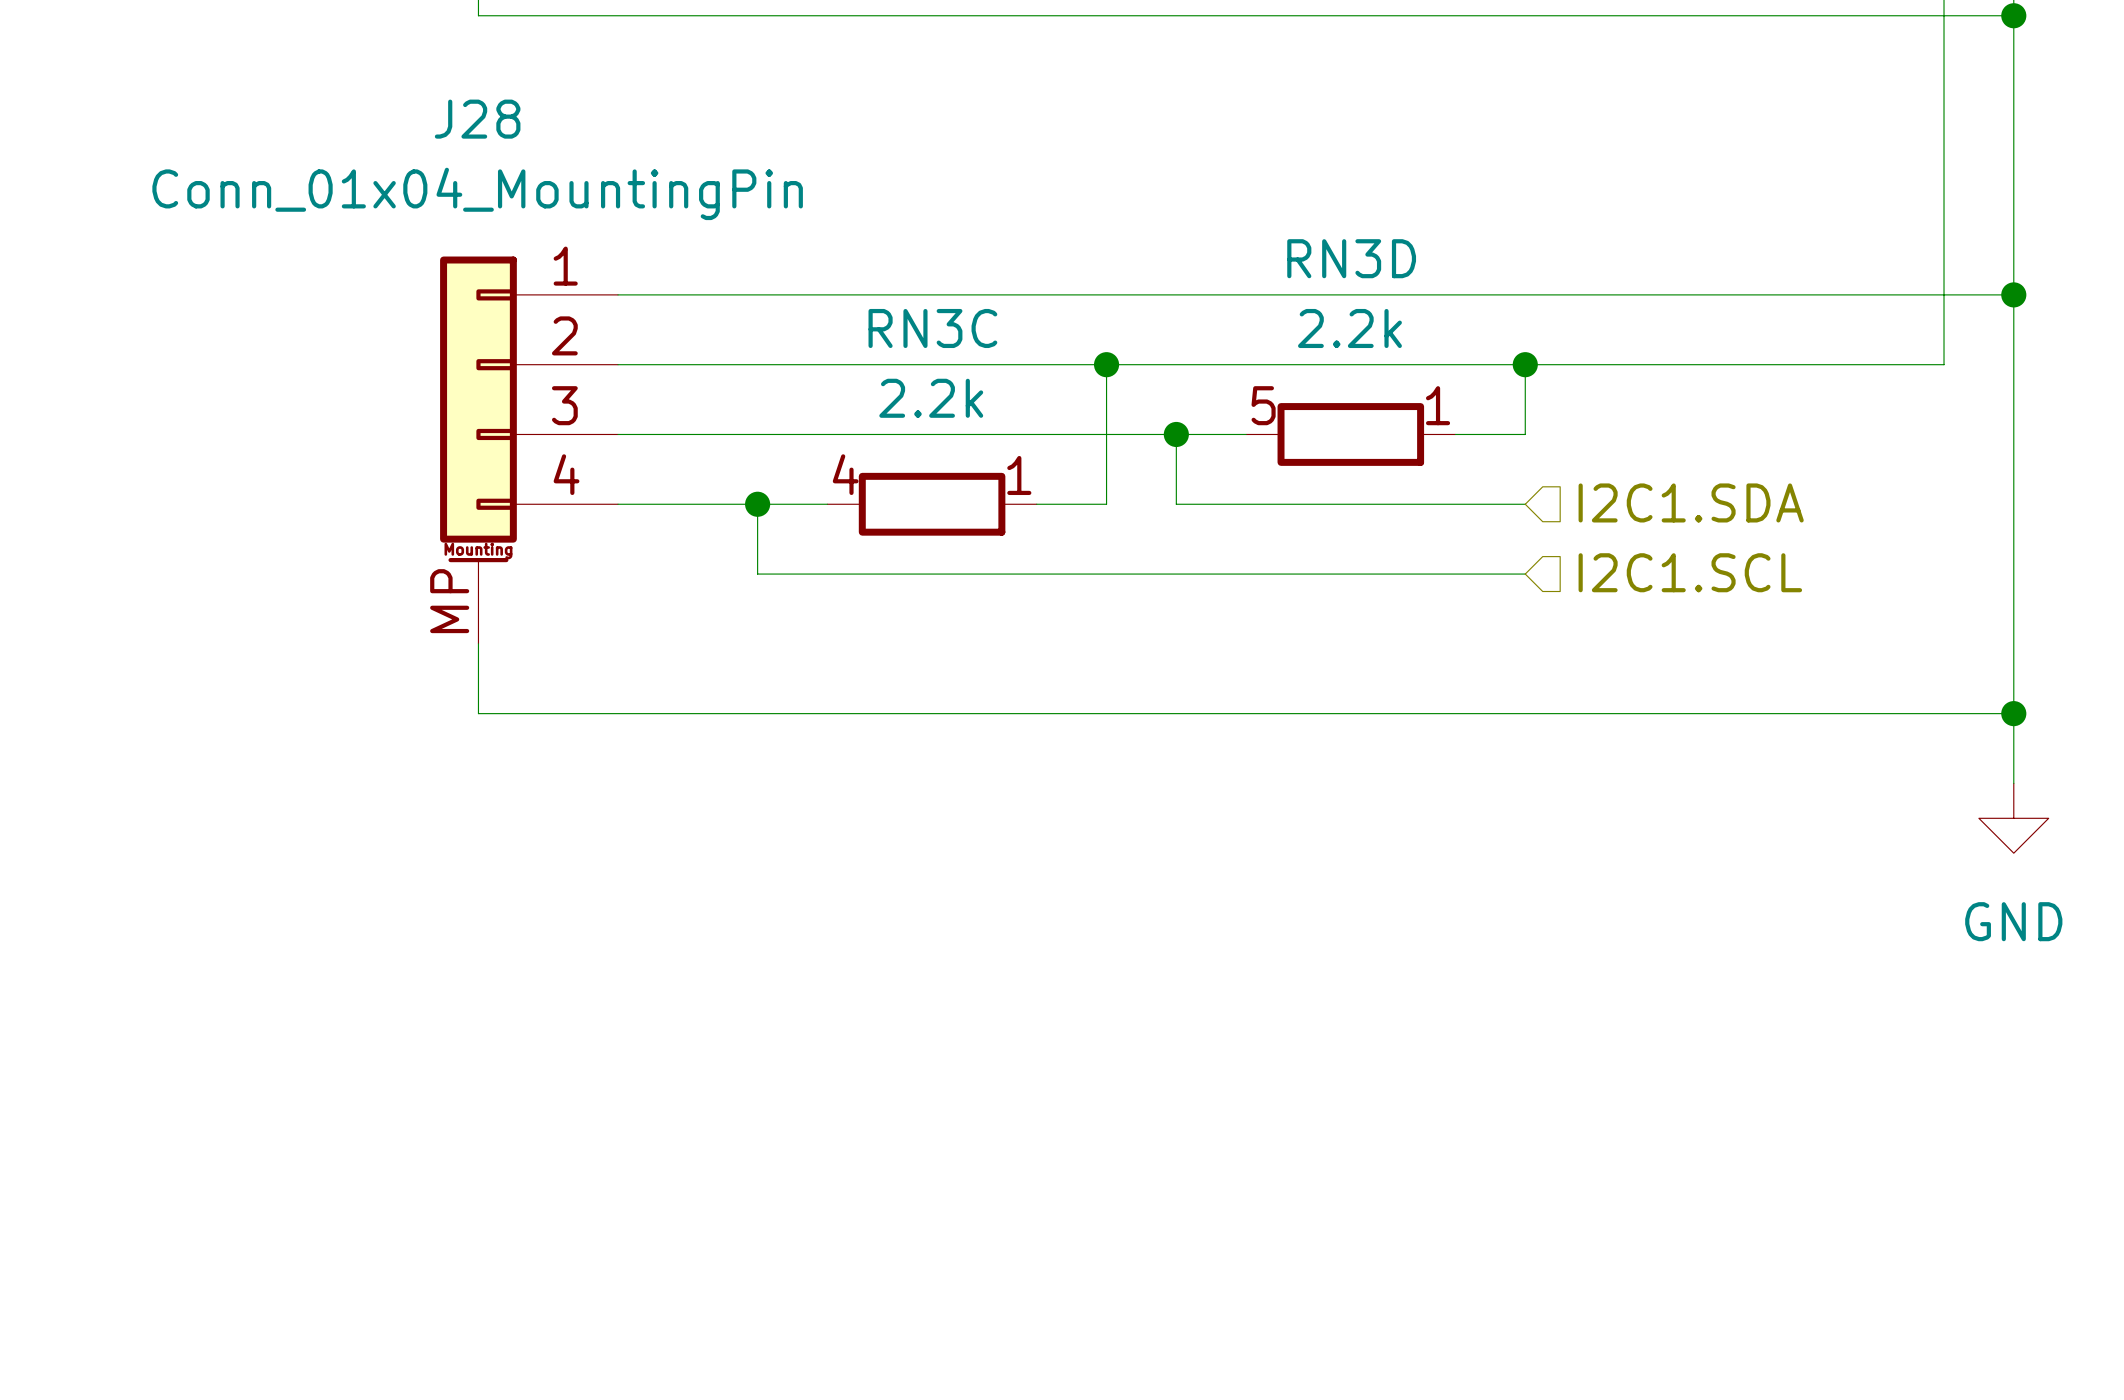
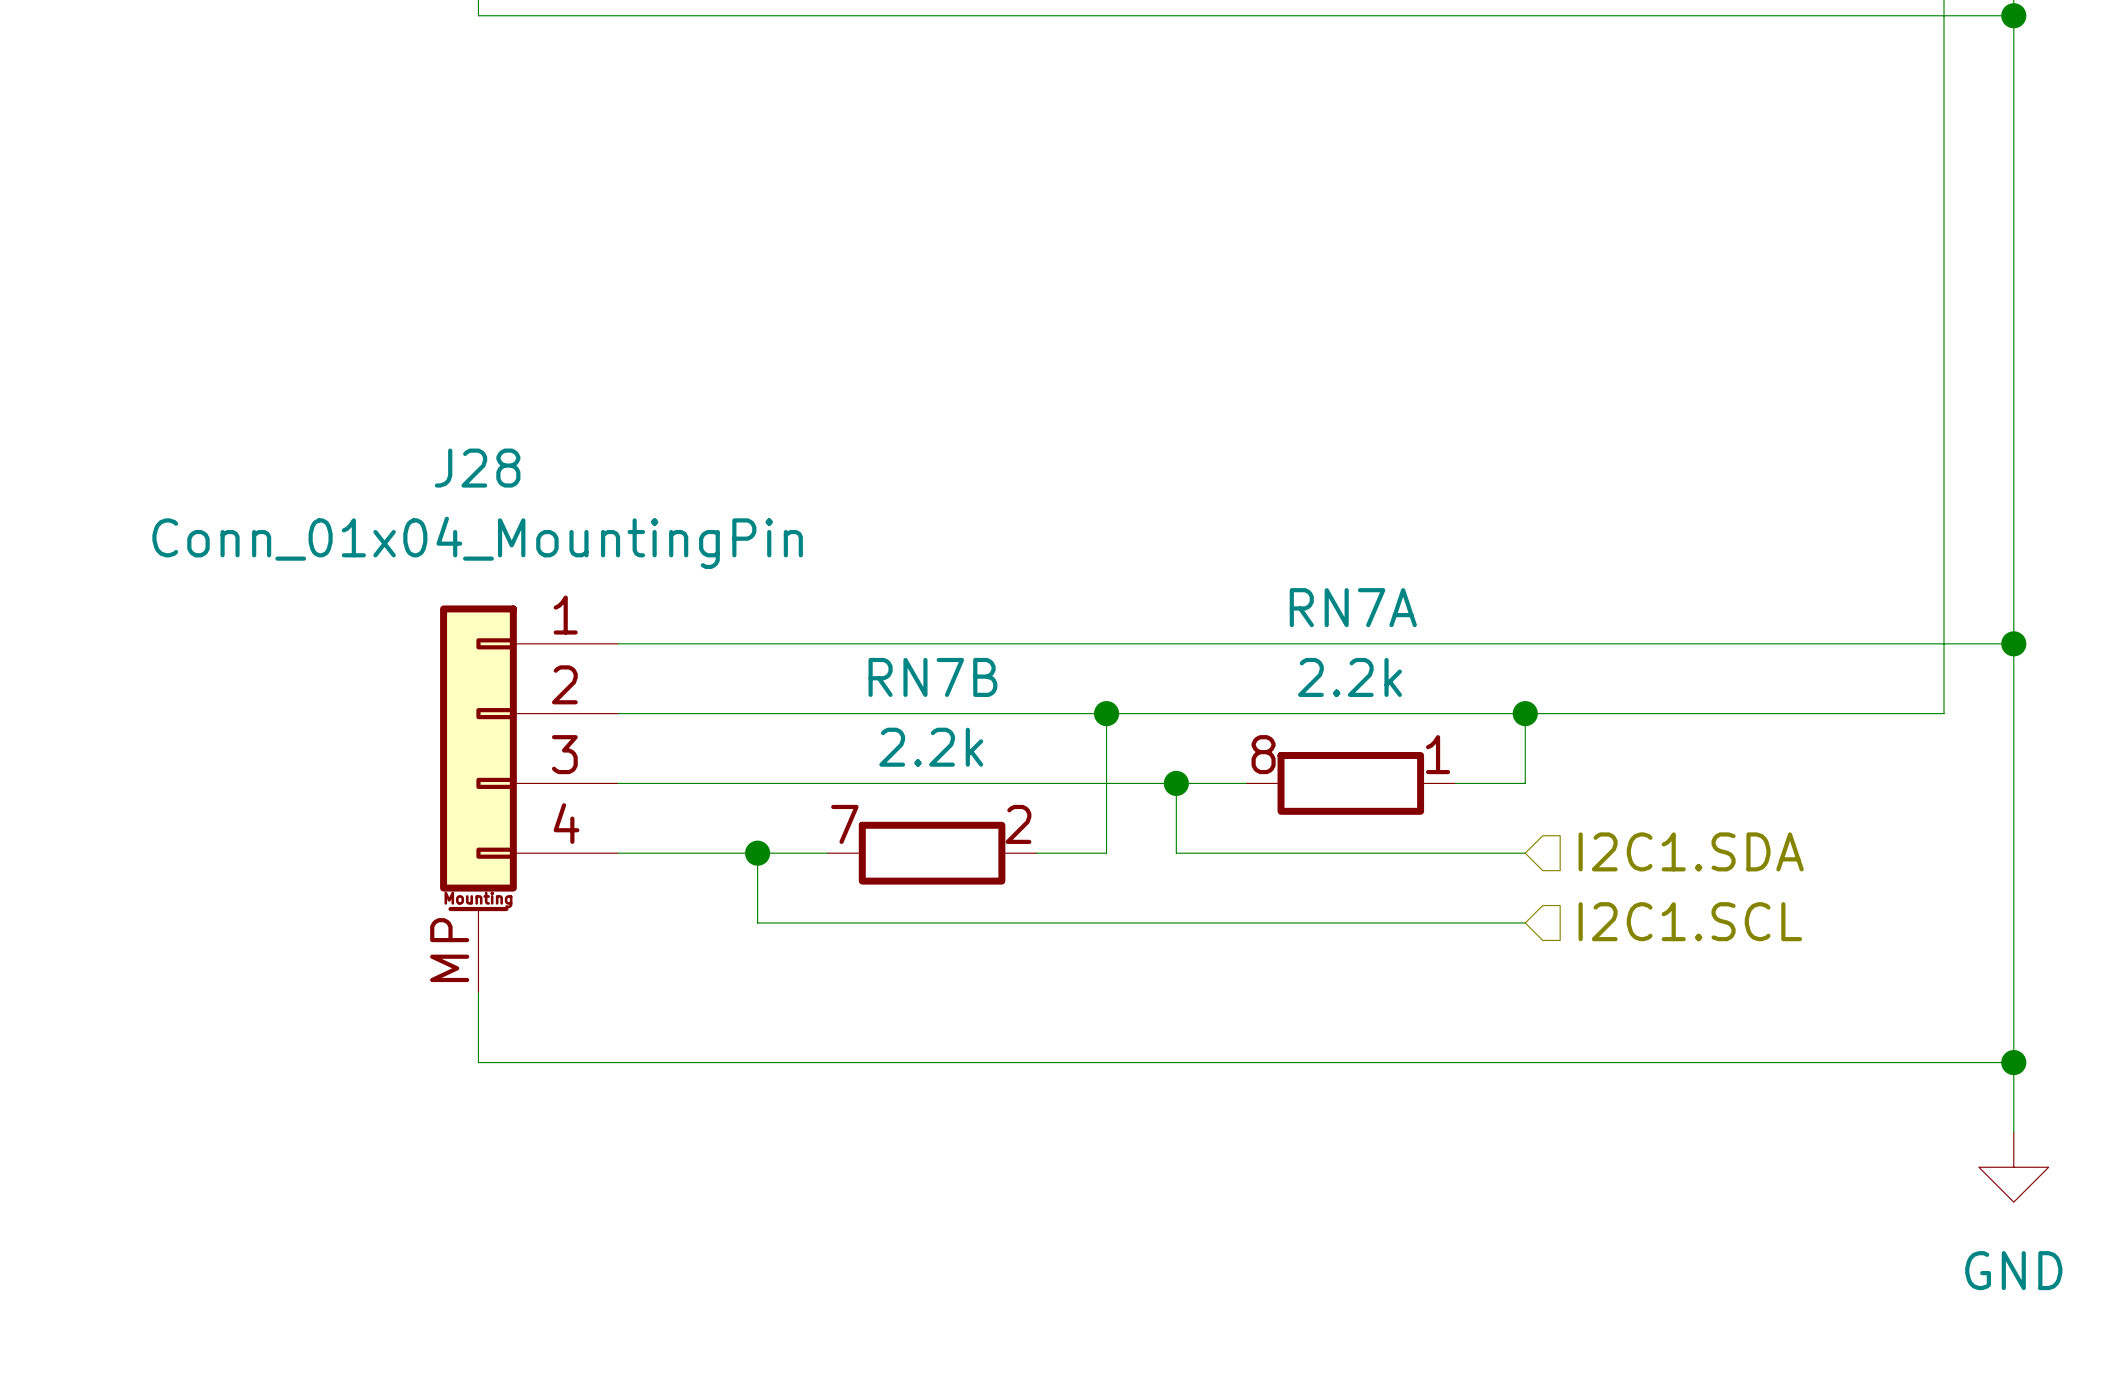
wire: (618, 294) (2013, 294) -> (618, 643) (2013, 643)
junction: (2013, 294) -> none
wire: (618, 364) (1944, 364) -> none
wire: (1106, 364) (1106, 504) (1036, 504) -> (1106, 713) (1106, 853) (1036, 853)
junction: (1106, 364) -> none
wire: (1525, 364) (1525, 434) (1455, 434) -> (1525, 713) (1525, 783) (1455, 783)
junction: (1525, 364) -> none
wire: (618, 434) (1246, 434) -> (618, 783) (1246, 783)
wire: (1176, 434) (1176, 504) (1525, 504) -> (1176, 783) (1176, 853) (1525, 853)
junction: (1176, 434) -> none
RN3D: 2.2k (1350, 434) -> none
J28 position: (529, 450) -> (529, 799)
hierarchical label position: I2C1.SDA (1691, 502) -> I2C1.SDA (1691, 851)
wire: (618, 504) (827, 504) -> (618, 853) (827, 853)
wire: (757, 504) (757, 574) (1525, 574) -> (757, 853) (757, 922) (1525, 922)
junction: (757, 504) -> none
RN3C: 2.2k (932, 504) -> none
hierarchical label position: I2C1.SCL (1690, 572) -> I2C1.SCL (1690, 921)
junction: none -> (1106, 713)
junction: none -> (1525, 713)
wire: (1944, 713) (2013, 713) -> (1944, 713) (1944, 364)
junction position: (2013, 713) -> (2013, 643)
junction: none -> (1176, 783)
RN7A: none -> 2.2k (1350, 783)
wire: none -> (2013, 783) (2013, 1132)
power symbol position: GND (2013, 818) -> GND (2013, 1167)
junction: none -> (757, 853)
RN7B: none -> 2.2k (932, 853)
wire: none -> (478, 992) (478, 1062) (2013, 1062)
junction: none -> (2013, 1062)

